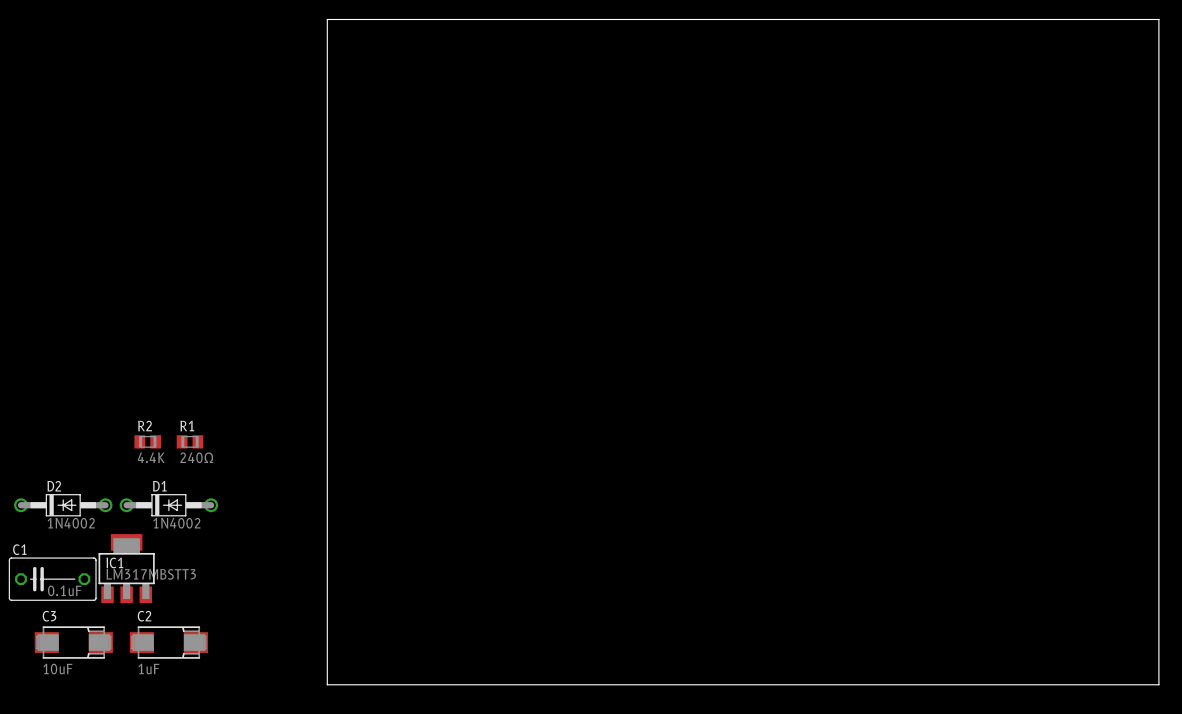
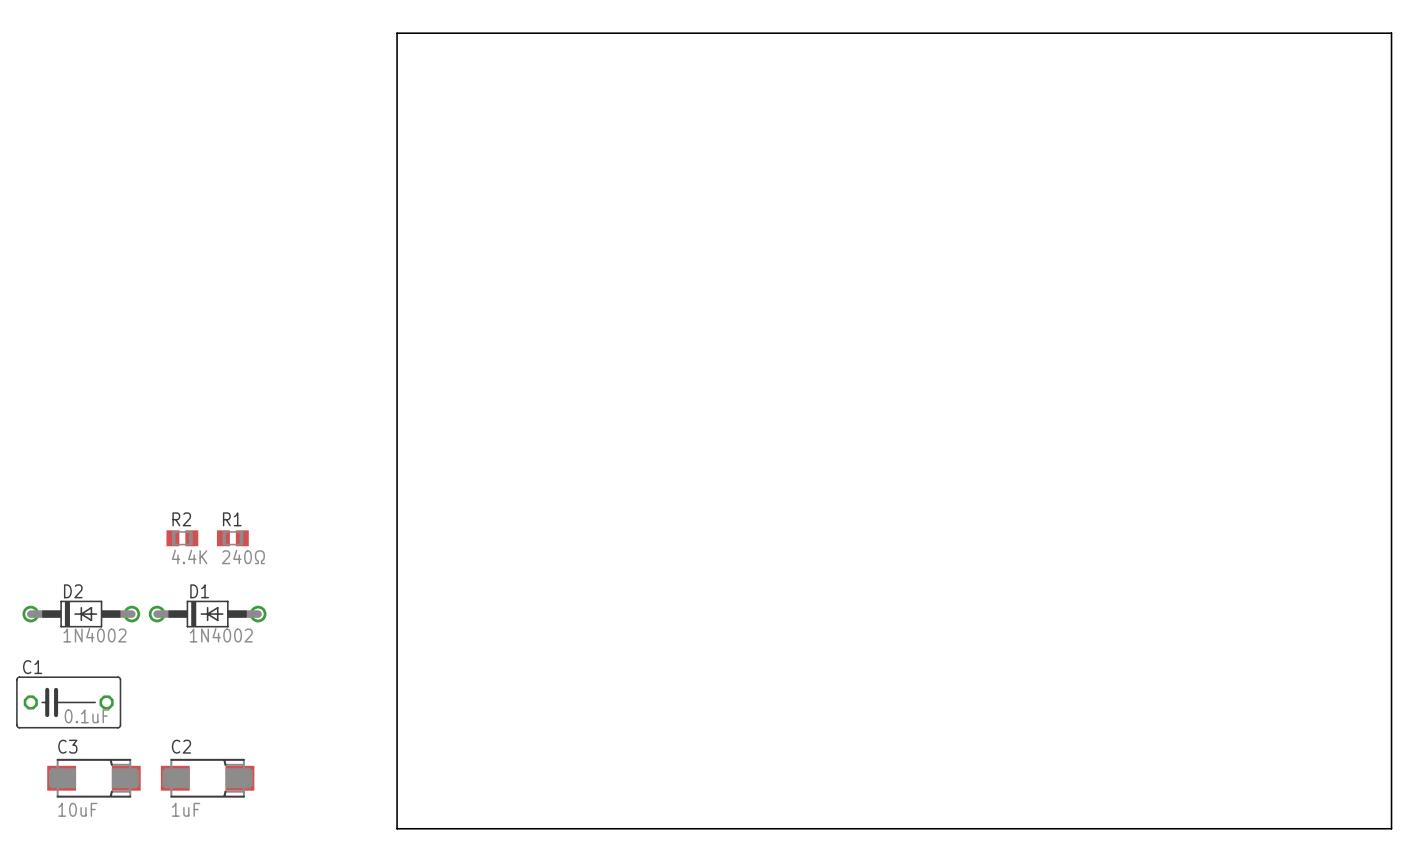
IC1: LM317MBSTT3 (126, 568) -> none

